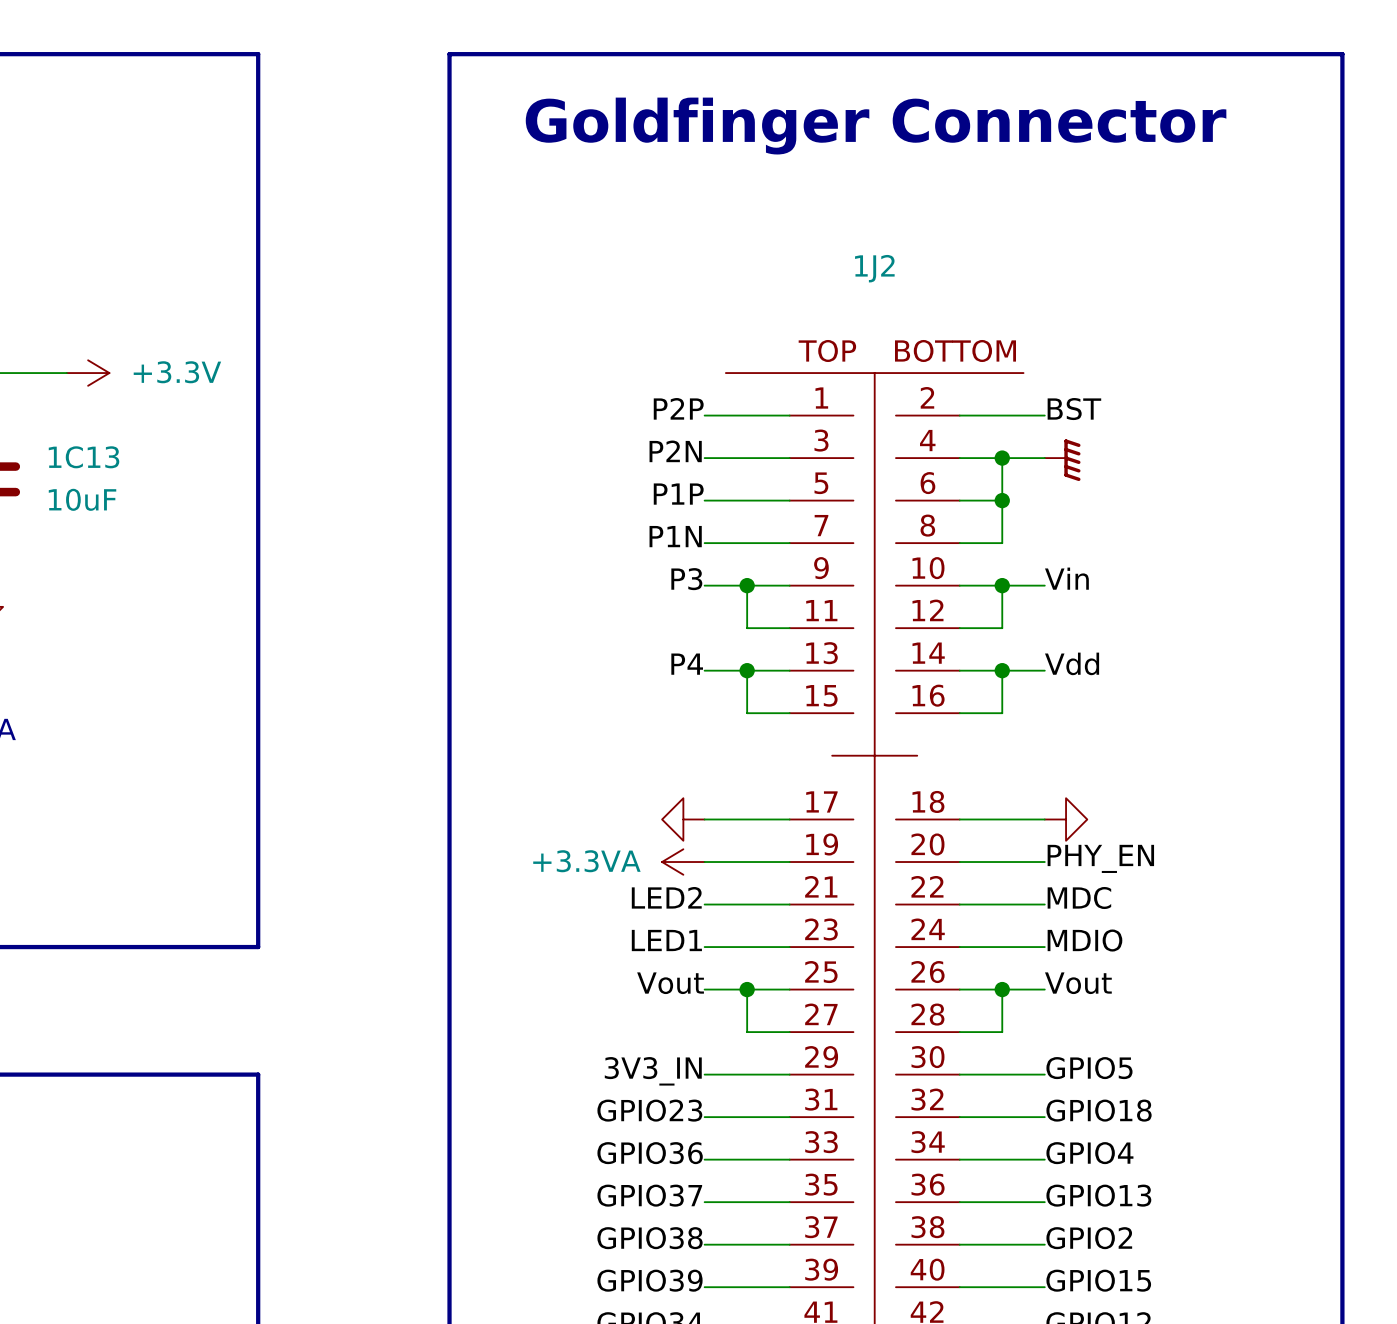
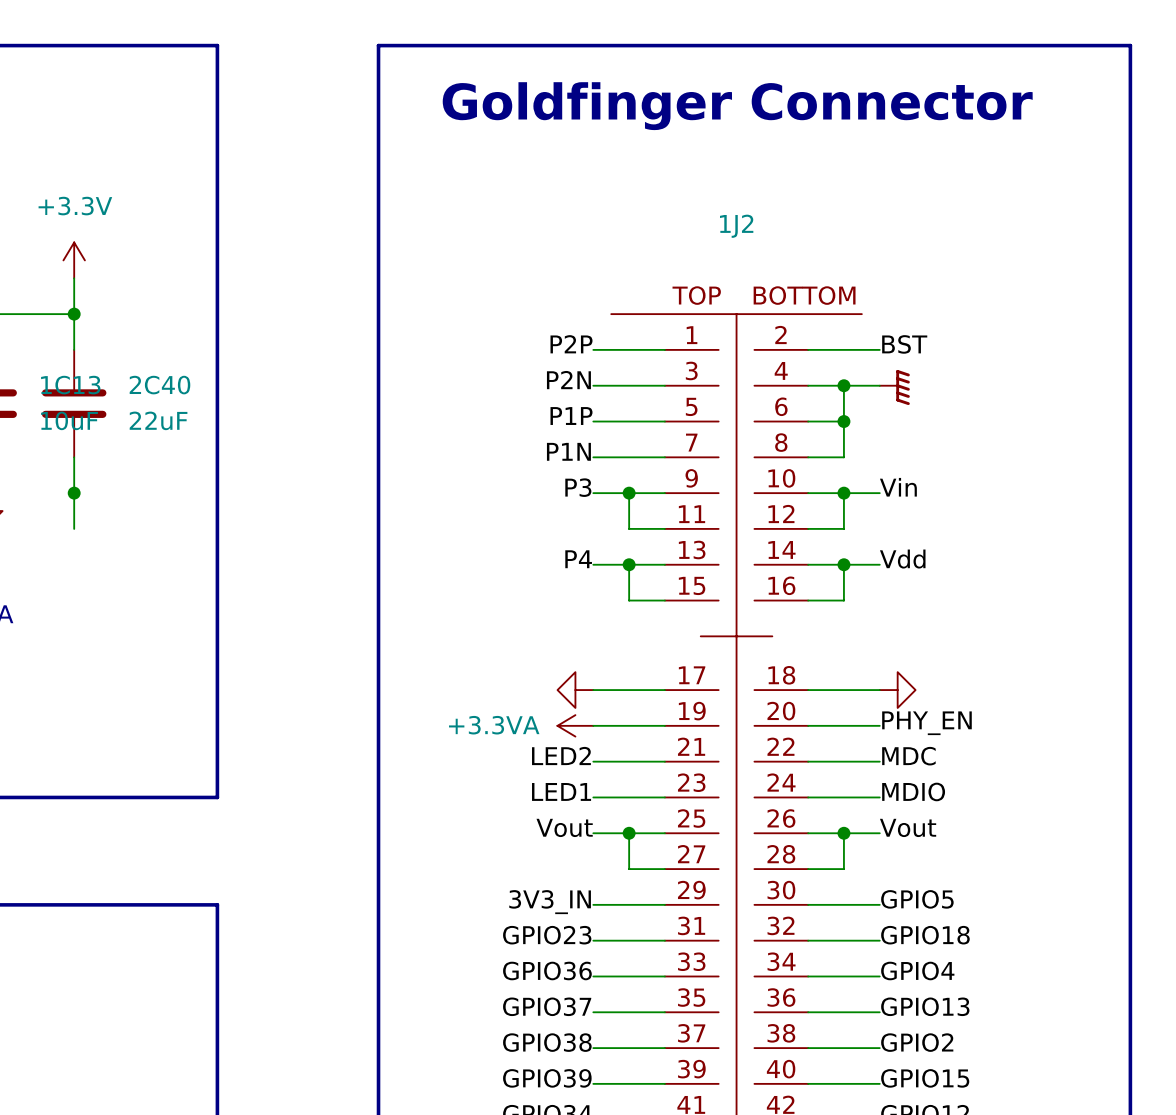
wire: none -> (74, 278) (74, 349)
power symbol text position: +3.3V (177, 372) -> +3.3V (75, 206)
junction: none -> (74, 314)
power symbol rotation: 0° (88, 373) -> 90° counterclockwise (74, 260)
power symbol position: +3.3V (88, 373) -> +3.3V (74, 260)
2C40: none -> 22uF (74, 403)
wire: none -> (74, 457) (74, 528)
junction: none -> (74, 493)

